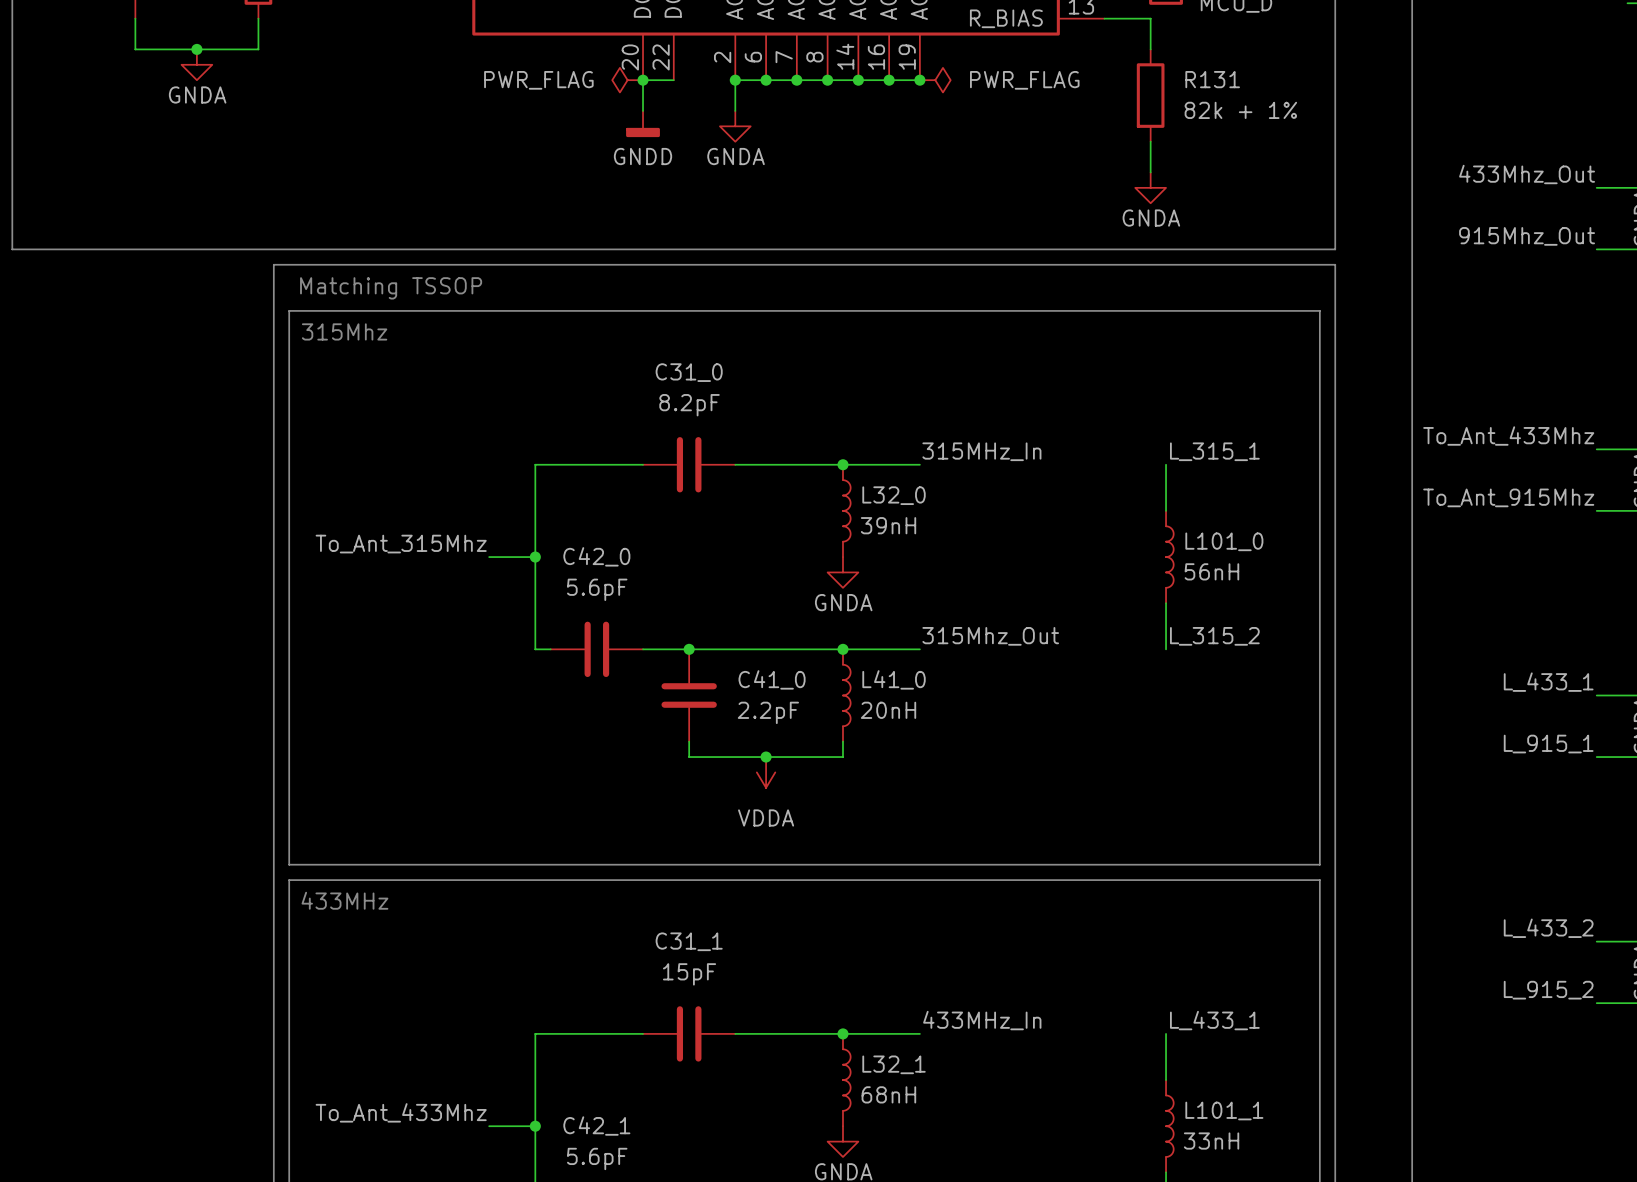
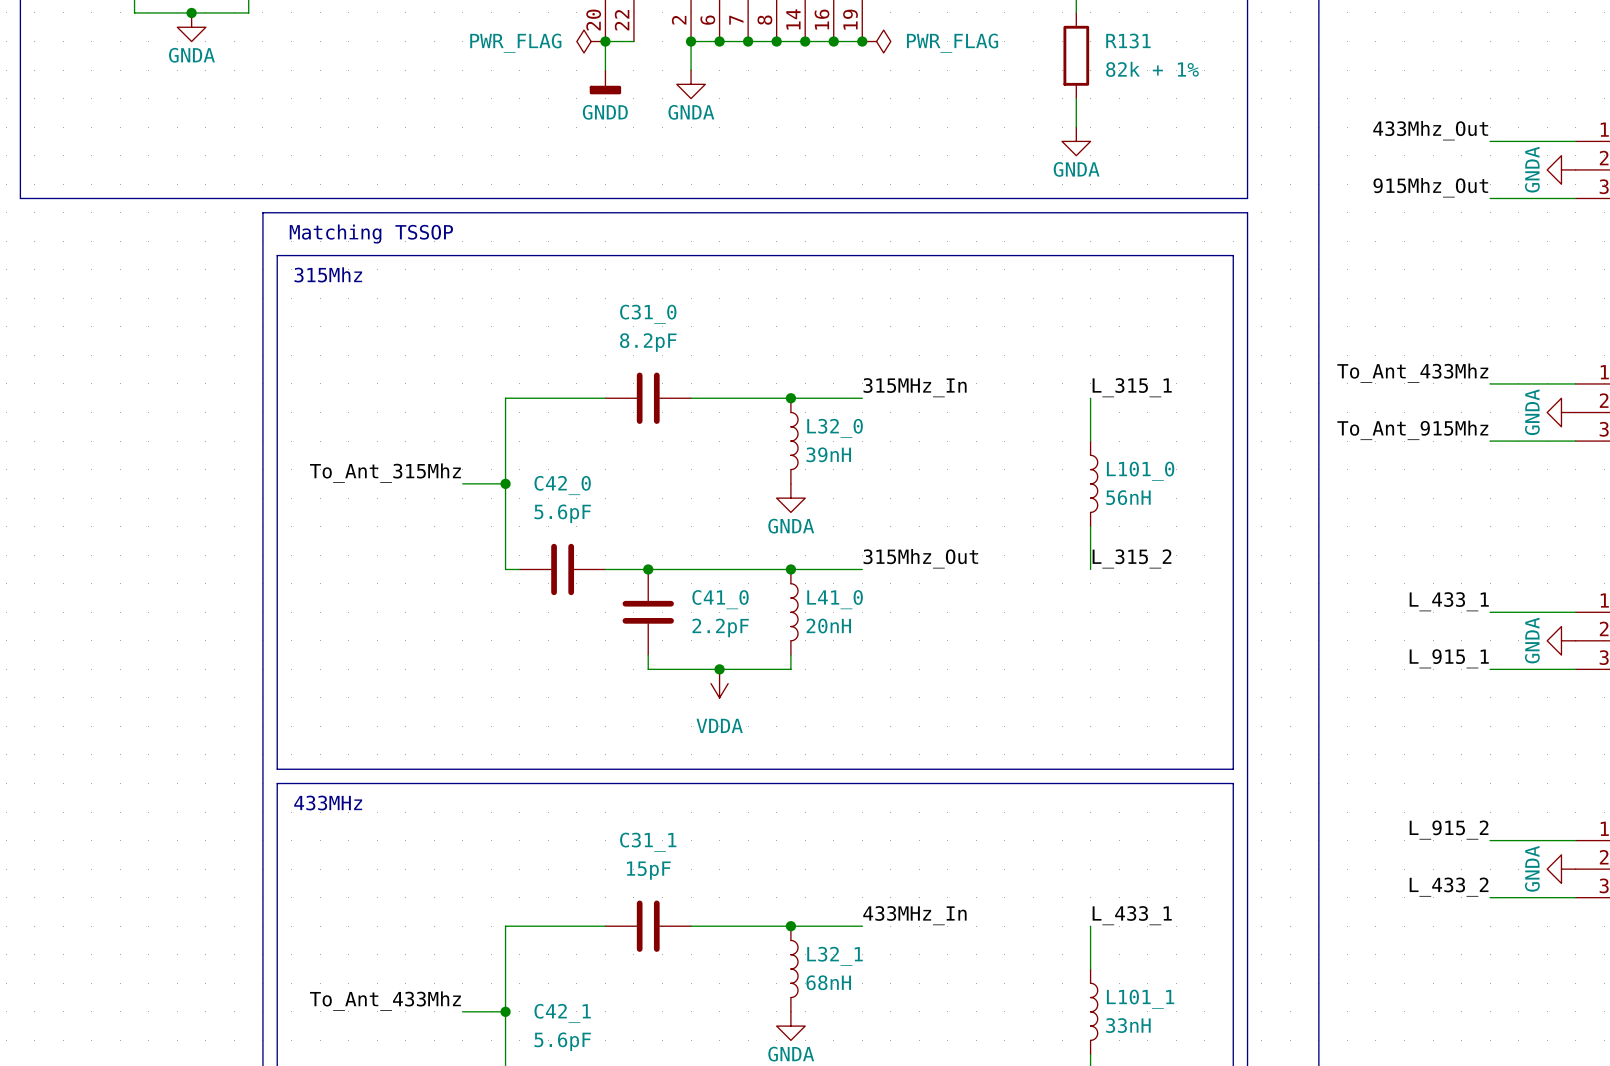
label: L_433_2 (1548, 928) -> L_915_2 (1449, 830)
label: L_915_2 (1548, 990) -> L_433_2 (1449, 887)

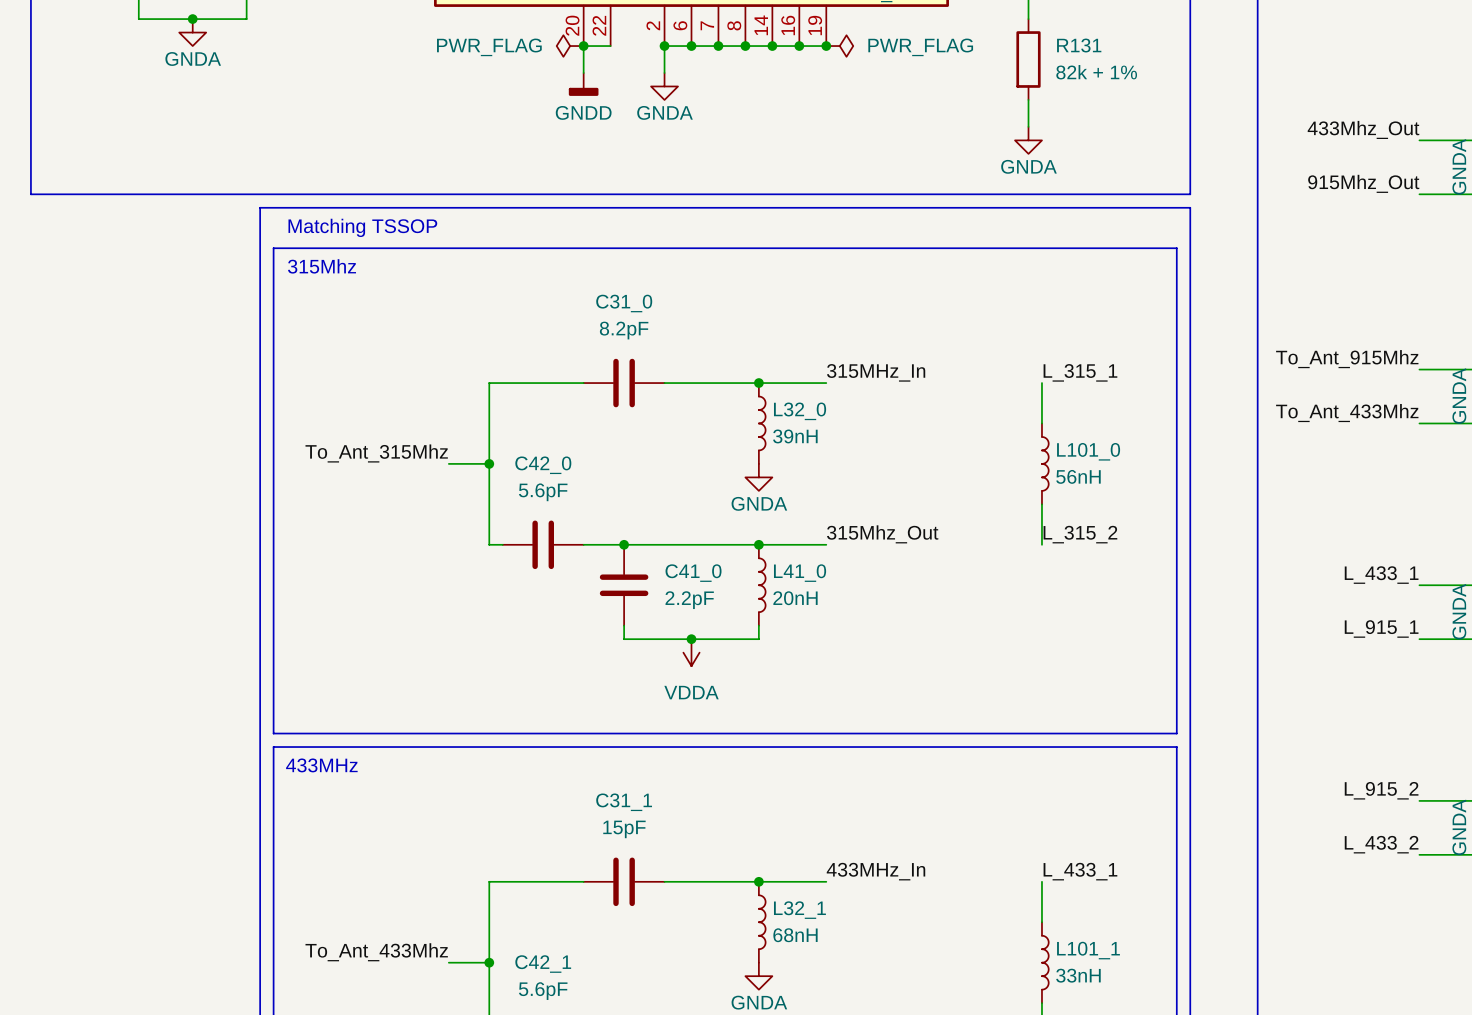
label: To_Ant_433Mhz (1412, 373) -> To_Ant_915Mhz (1347, 359)
label: To_Ant_915Mhz (1412, 430) -> To_Ant_433Mhz (1347, 413)

